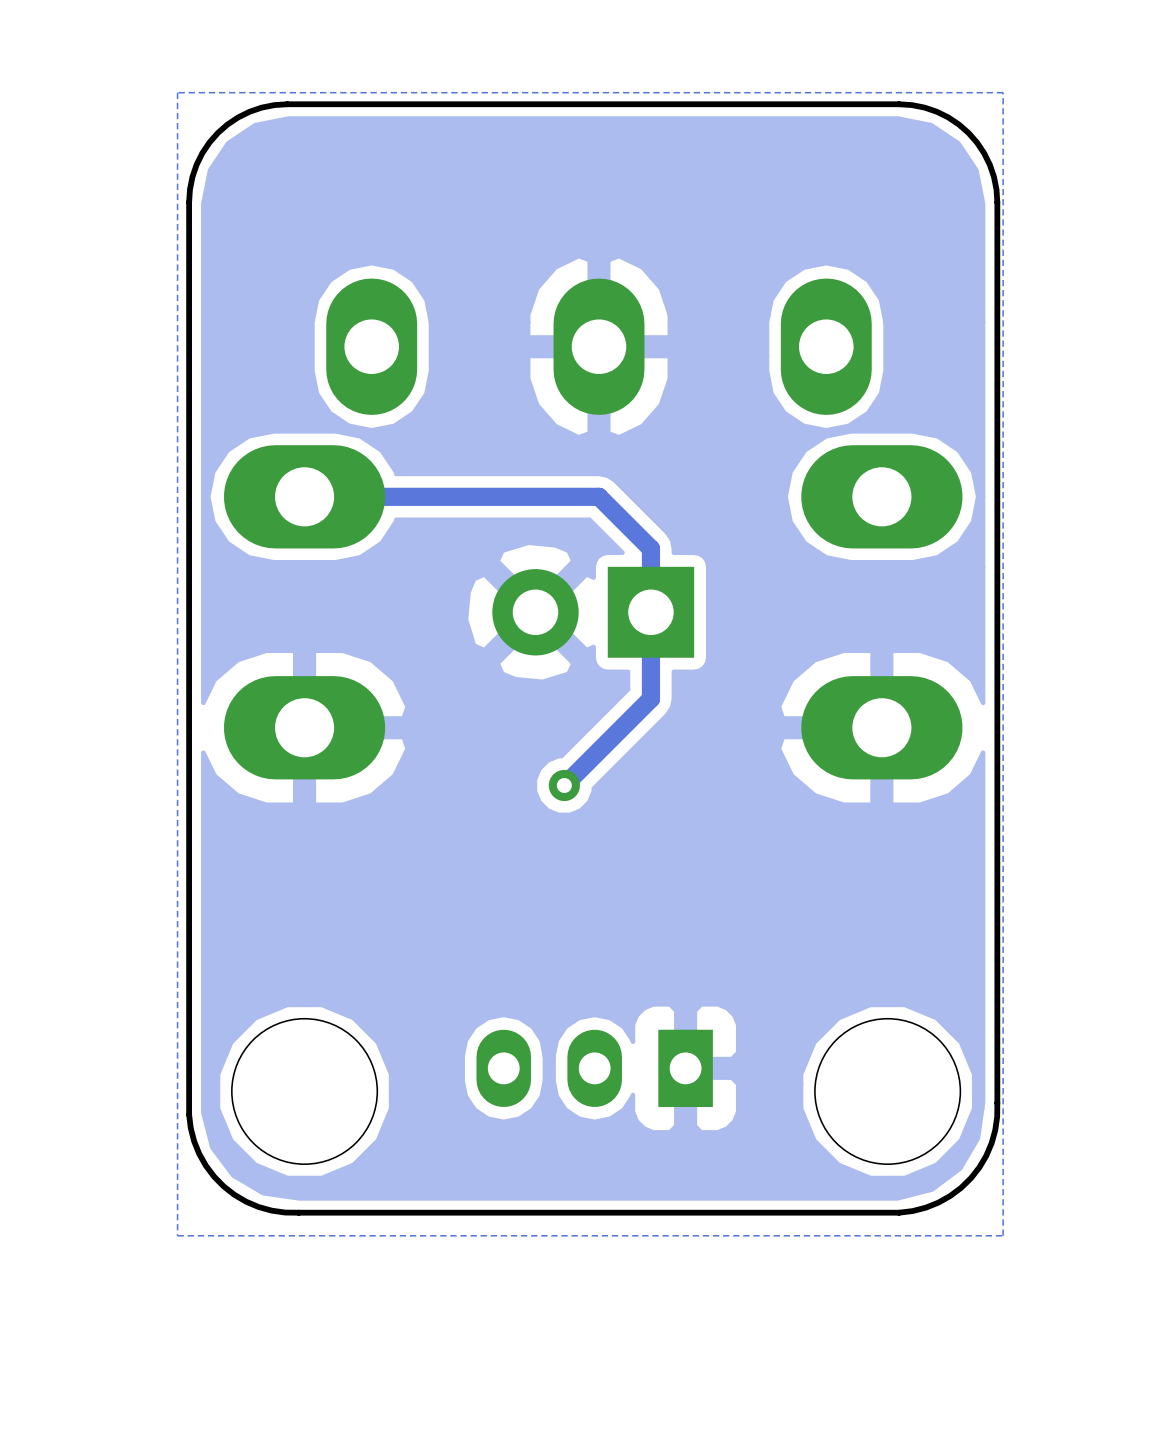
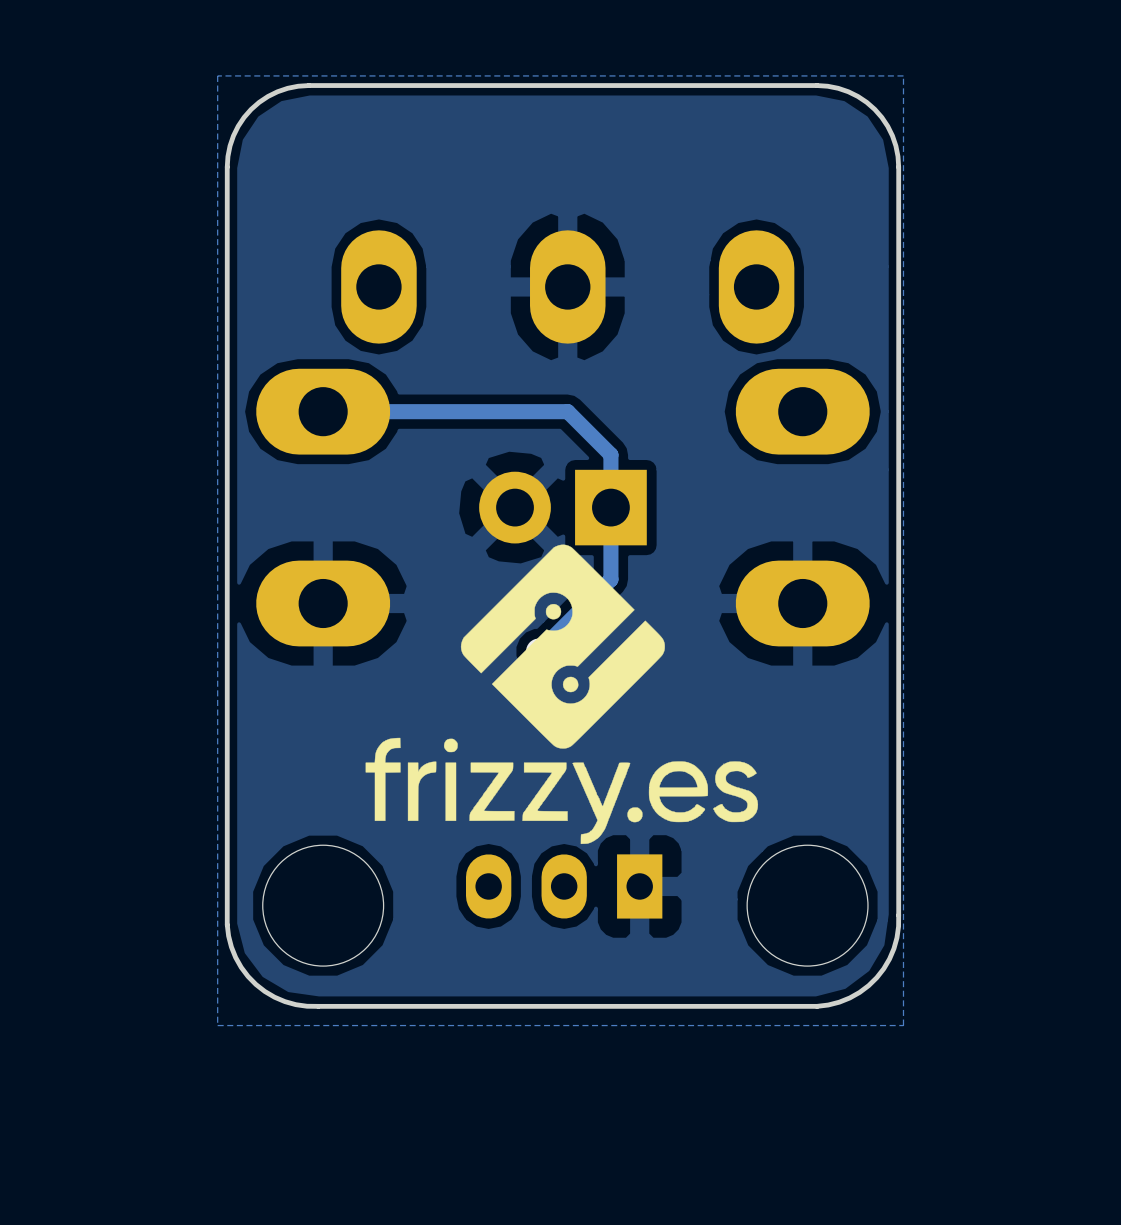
drawing: none -> [365, 544, 759, 845]

